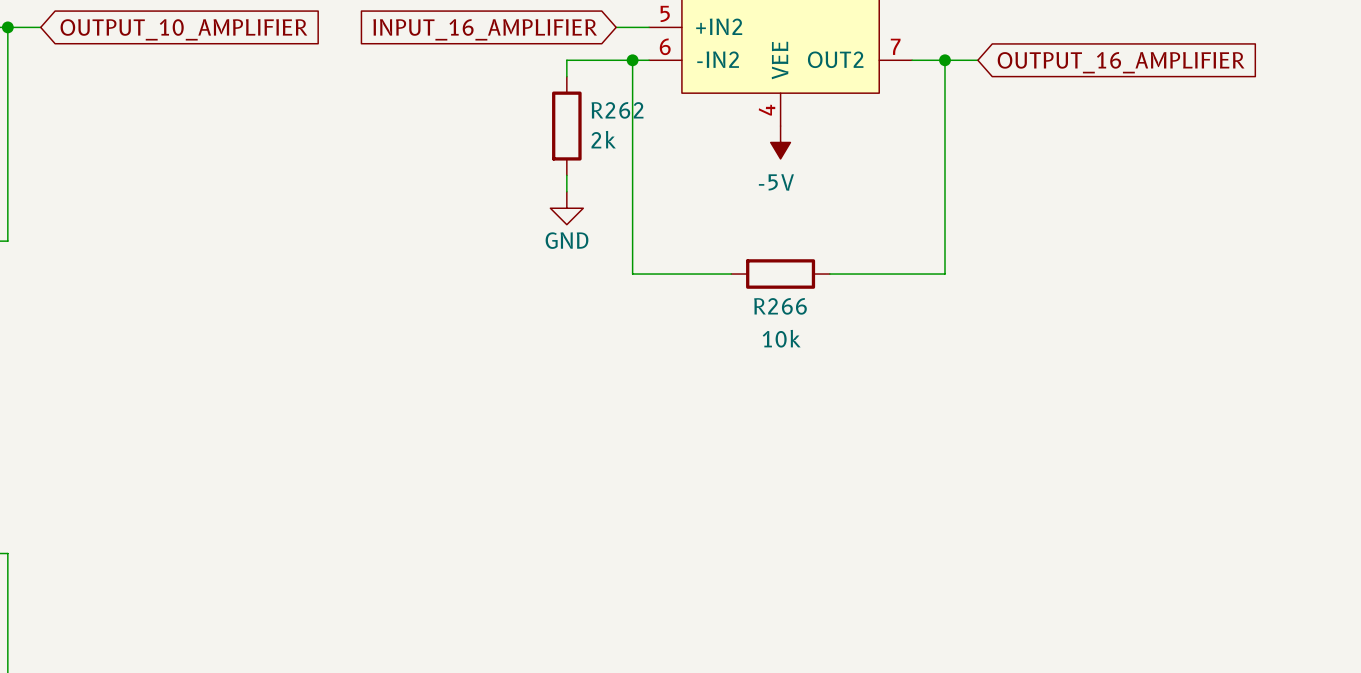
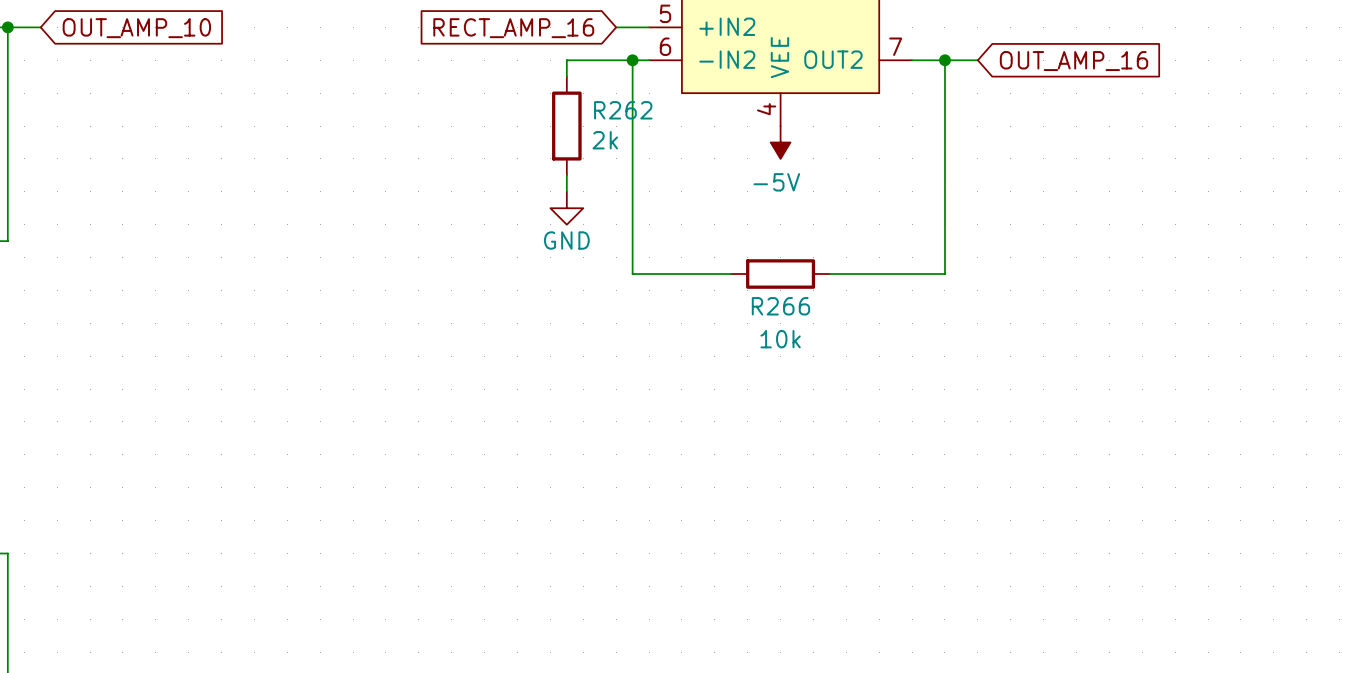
global label: OUTPUT_10_AMPLIFIER (183, 29) -> OUT_AMP_10 (136, 28)
global label: INPUT_16_AMPLIFIER (485, 29) -> RECT_AMP_16 (513, 28)
global label: OUTPUT_16_AMPLIFIER (1121, 62) -> OUT_AMP_16 (1074, 61)

